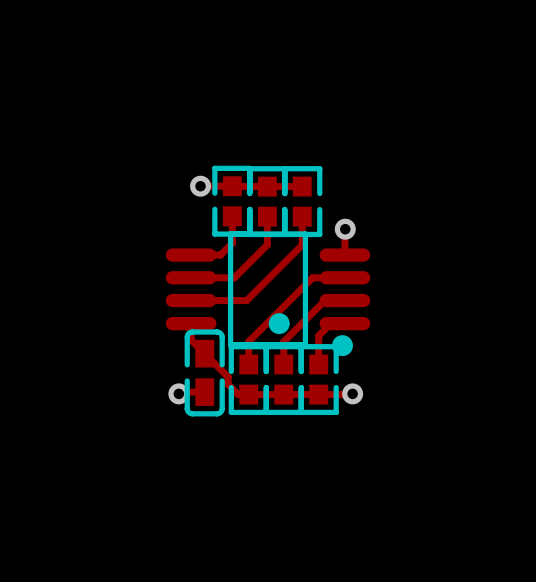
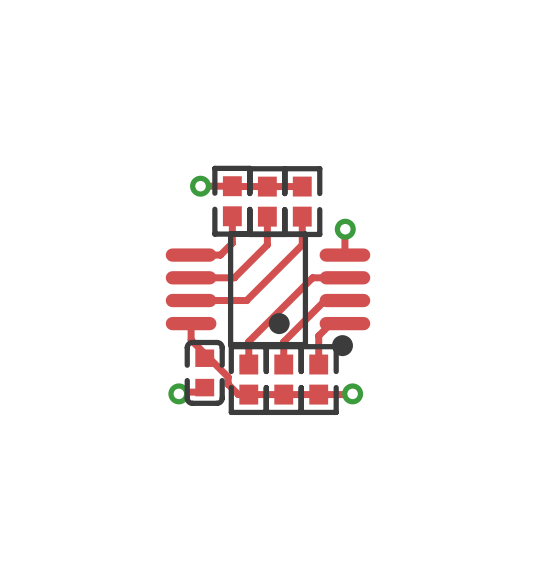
part footprint: [184, 329, 225, 417] -> [184, 339, 225, 406]

